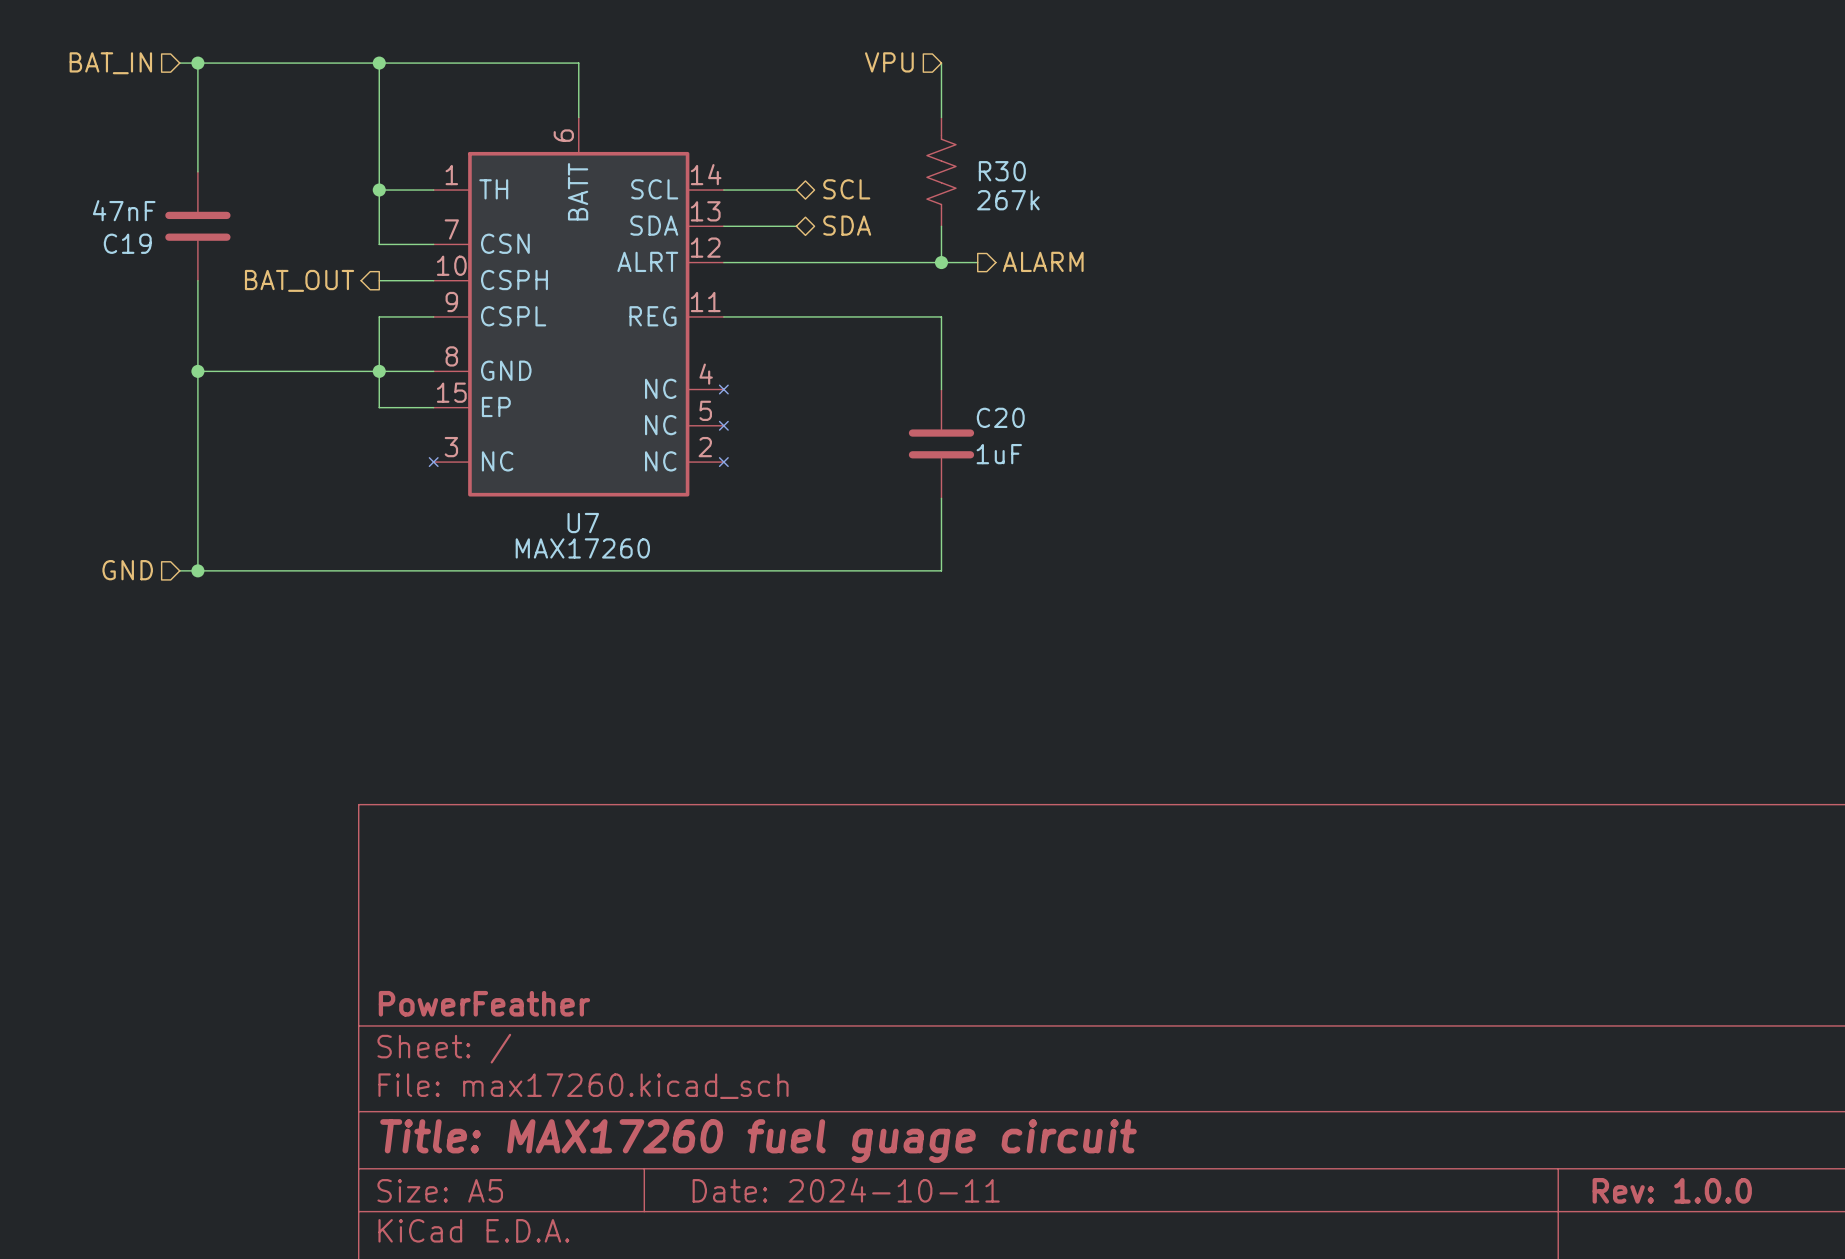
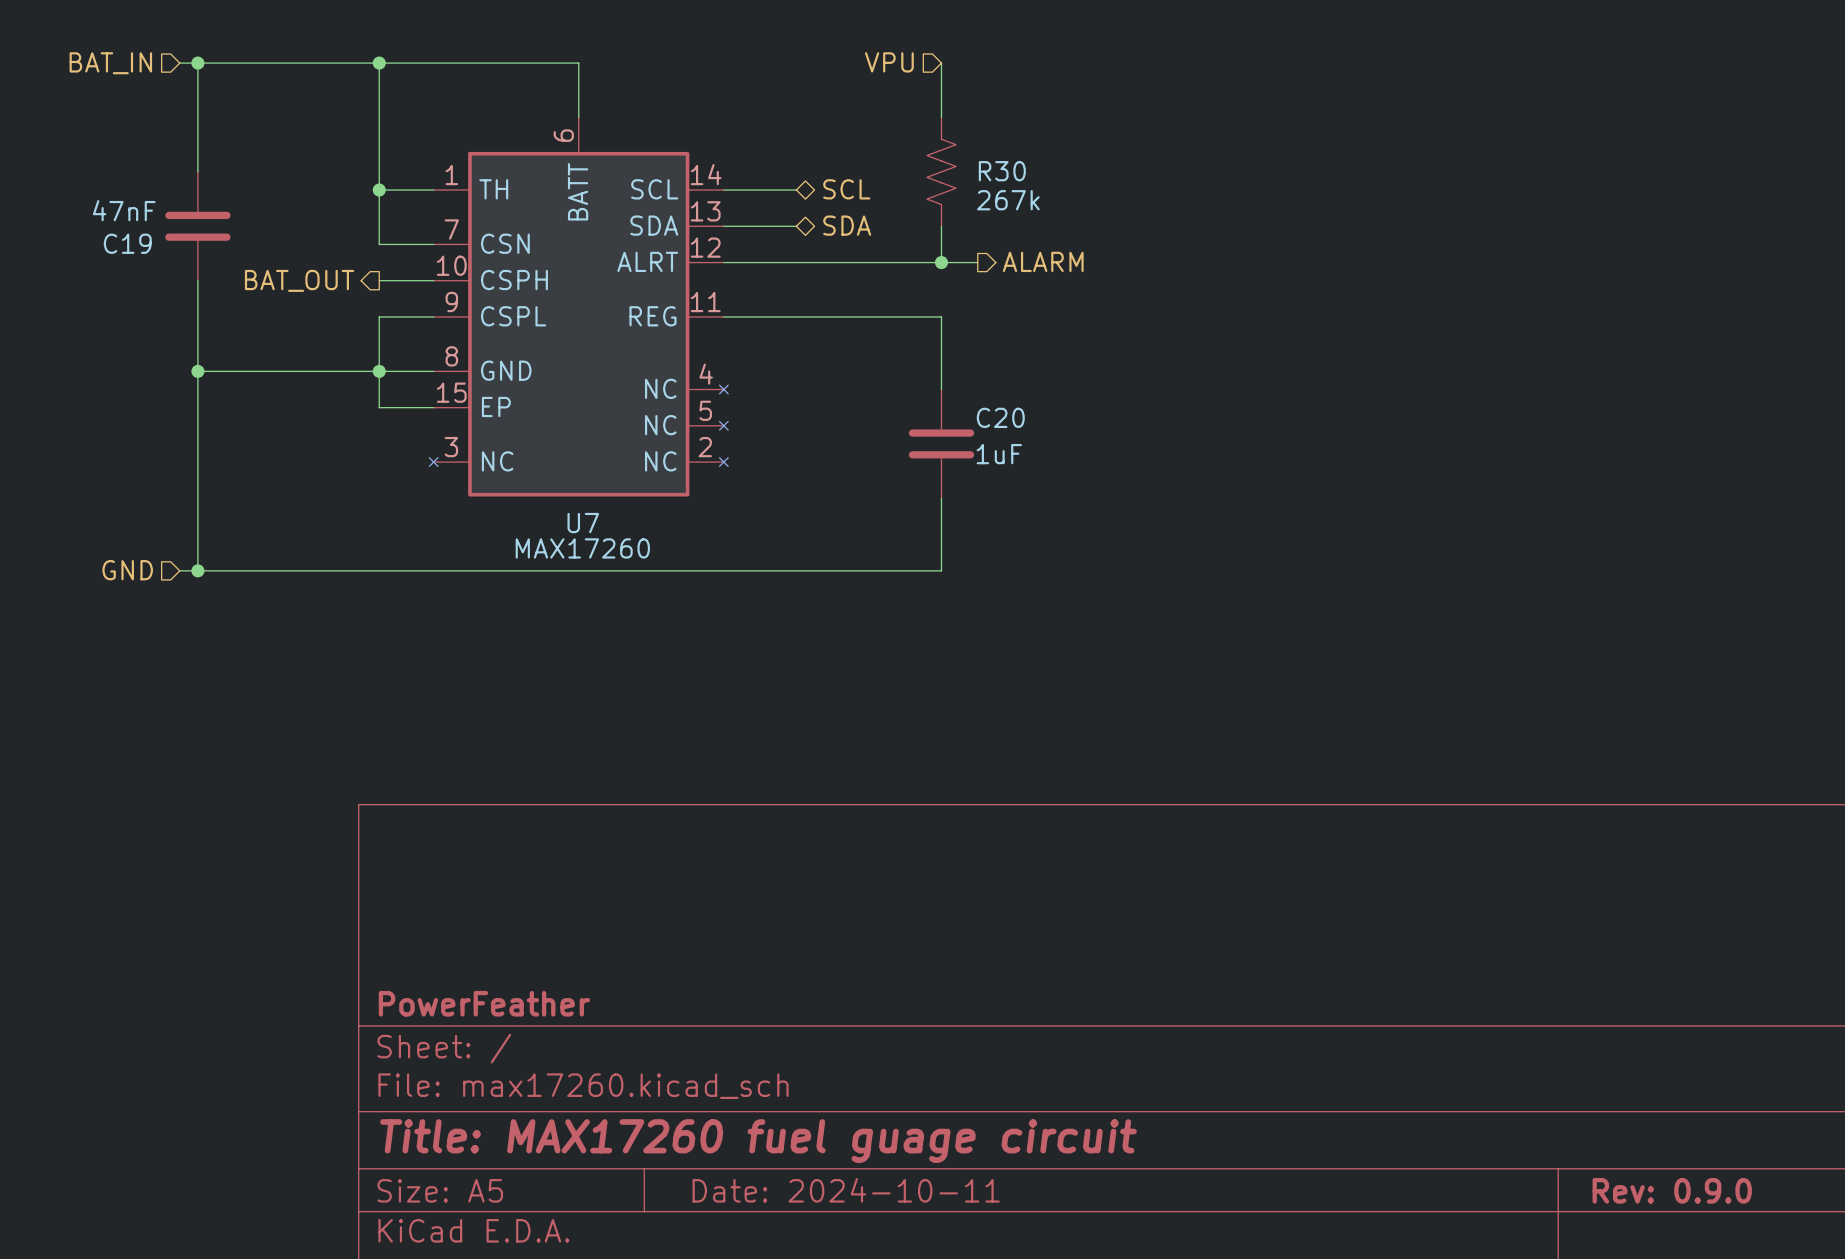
title block: Rev: 1.0.0 (1672, 1190) -> Rev: 0.9.0 (1672, 1190)

